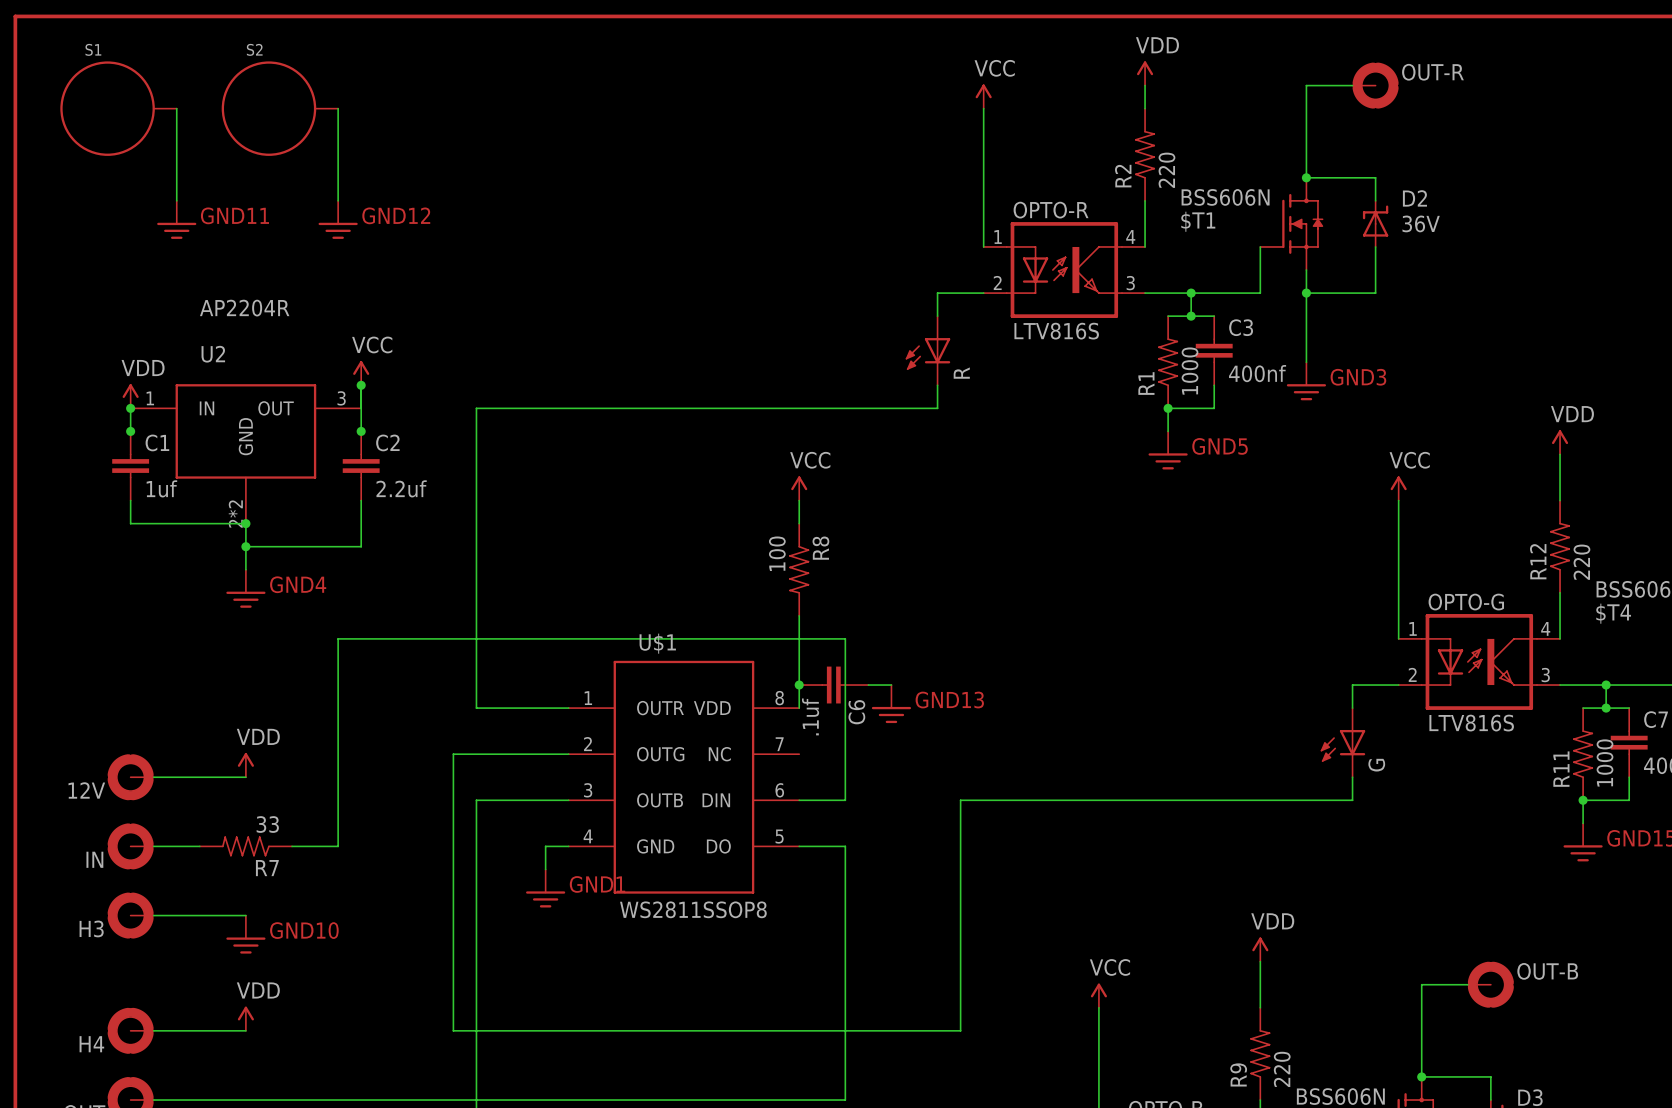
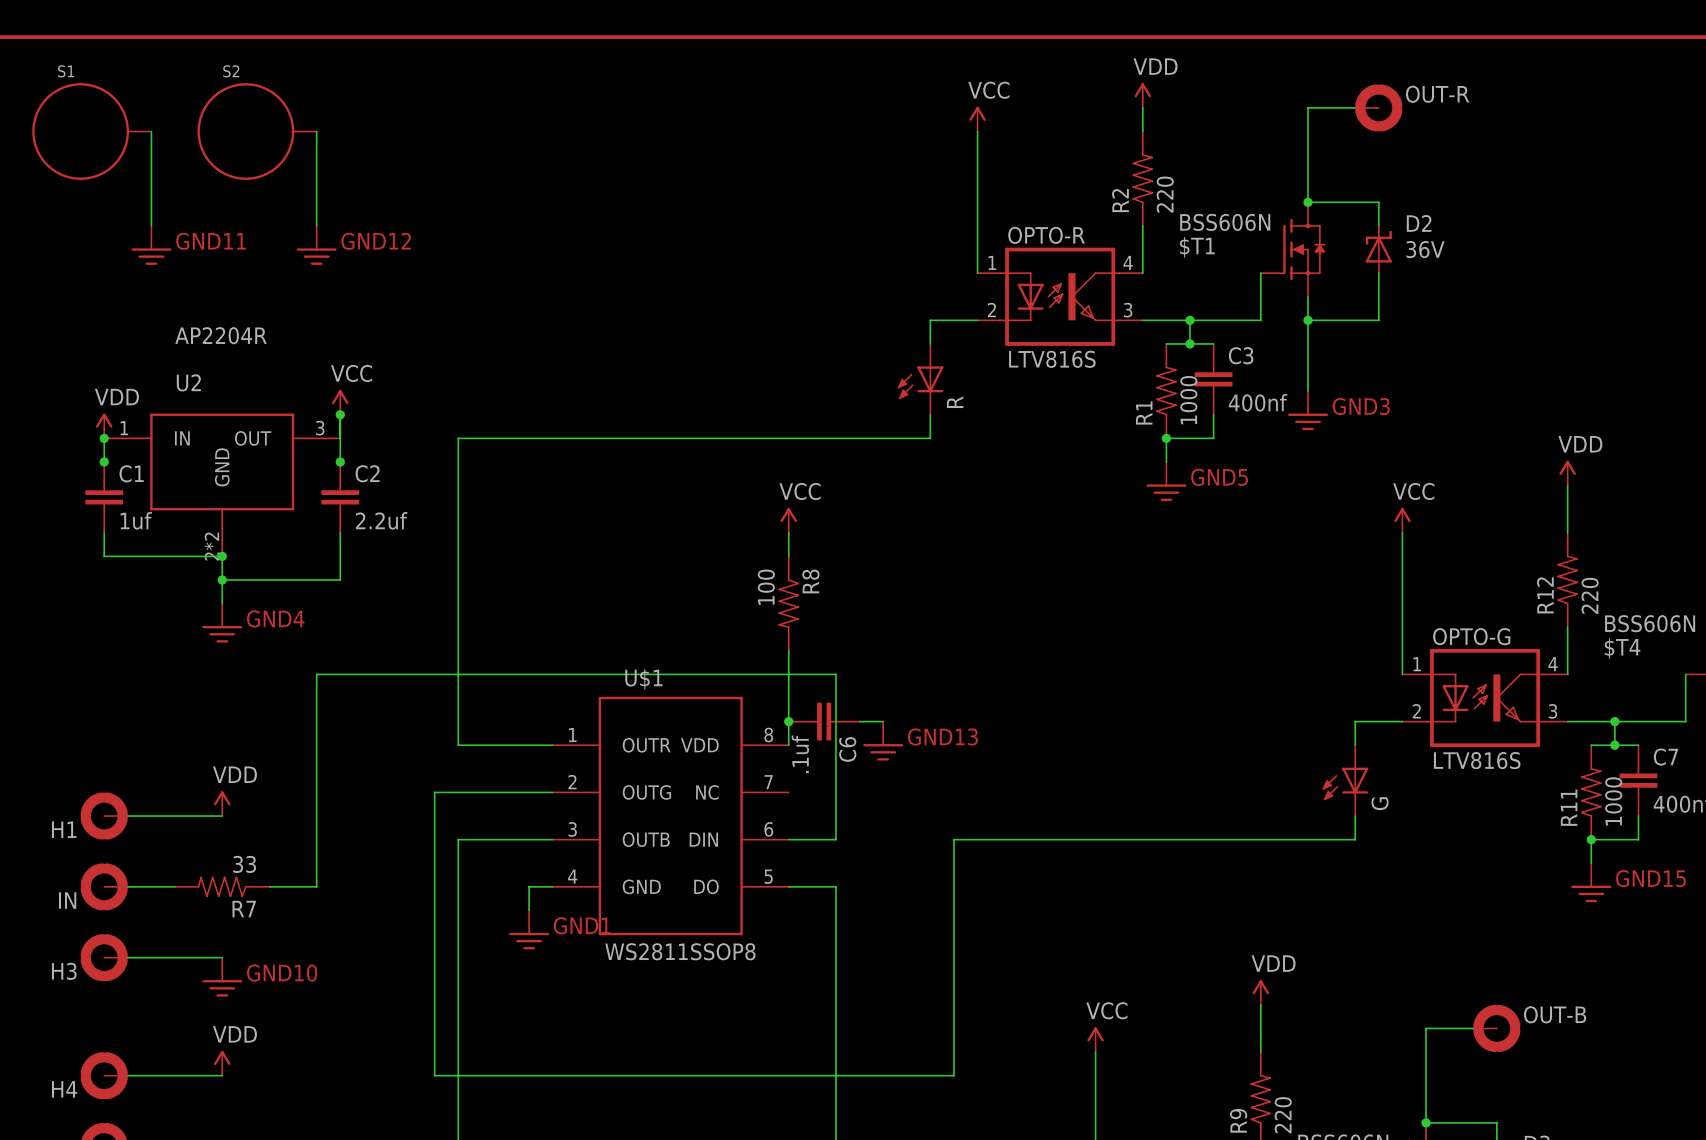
12V name: 12V (86, 790) -> H1 (64, 829)

